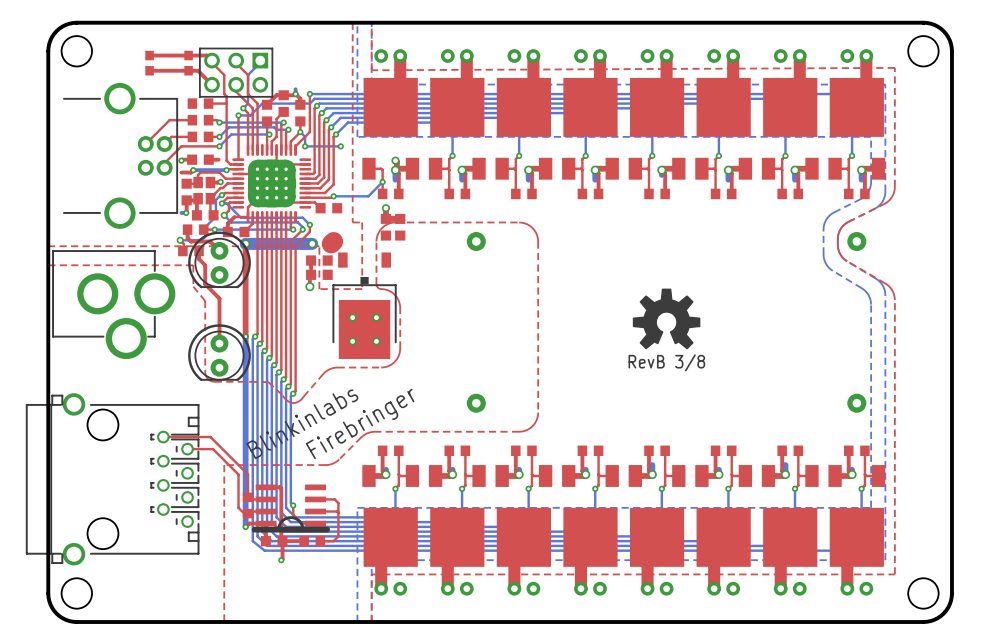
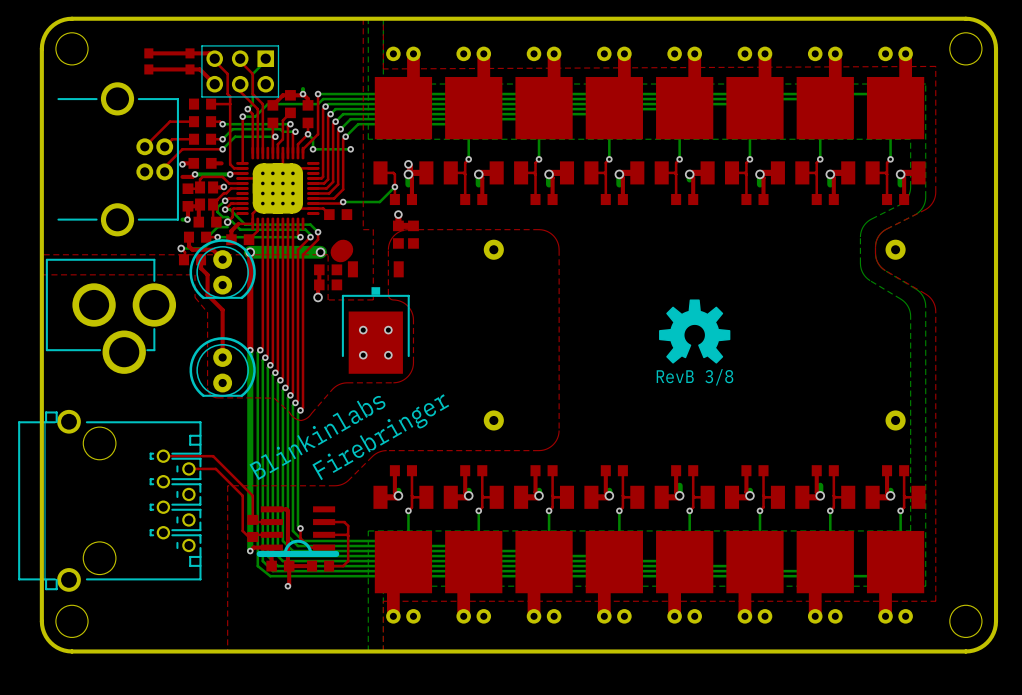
bottom track: (221, 195) (215, 199) (215, 216) (205, 227) (205, 236) -> (227, 227) (217, 227) (210, 234) (210, 242) (207, 244)
bottom track: (224, 215) (231, 222) (236, 222) -> (227, 199) (217, 207) (217, 212) (222, 217) (227, 217) (240, 229)

